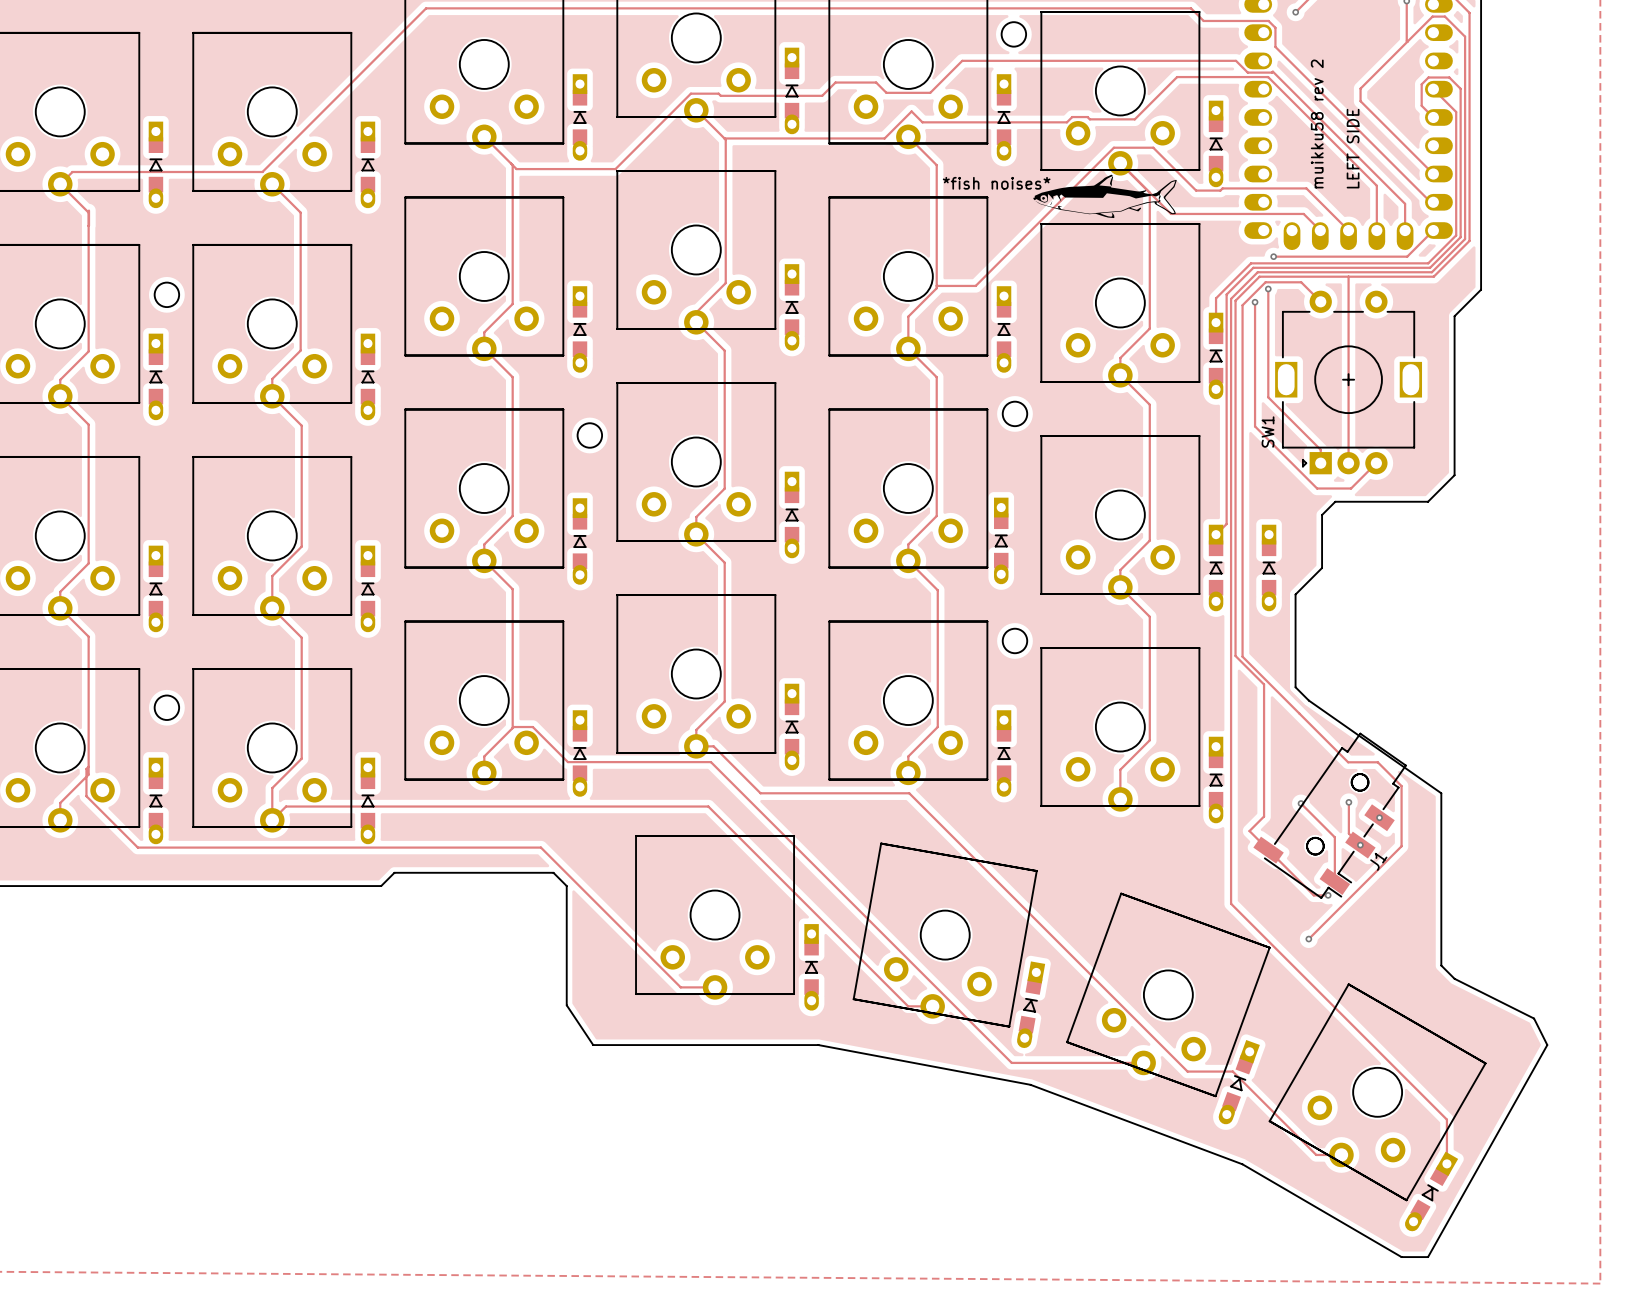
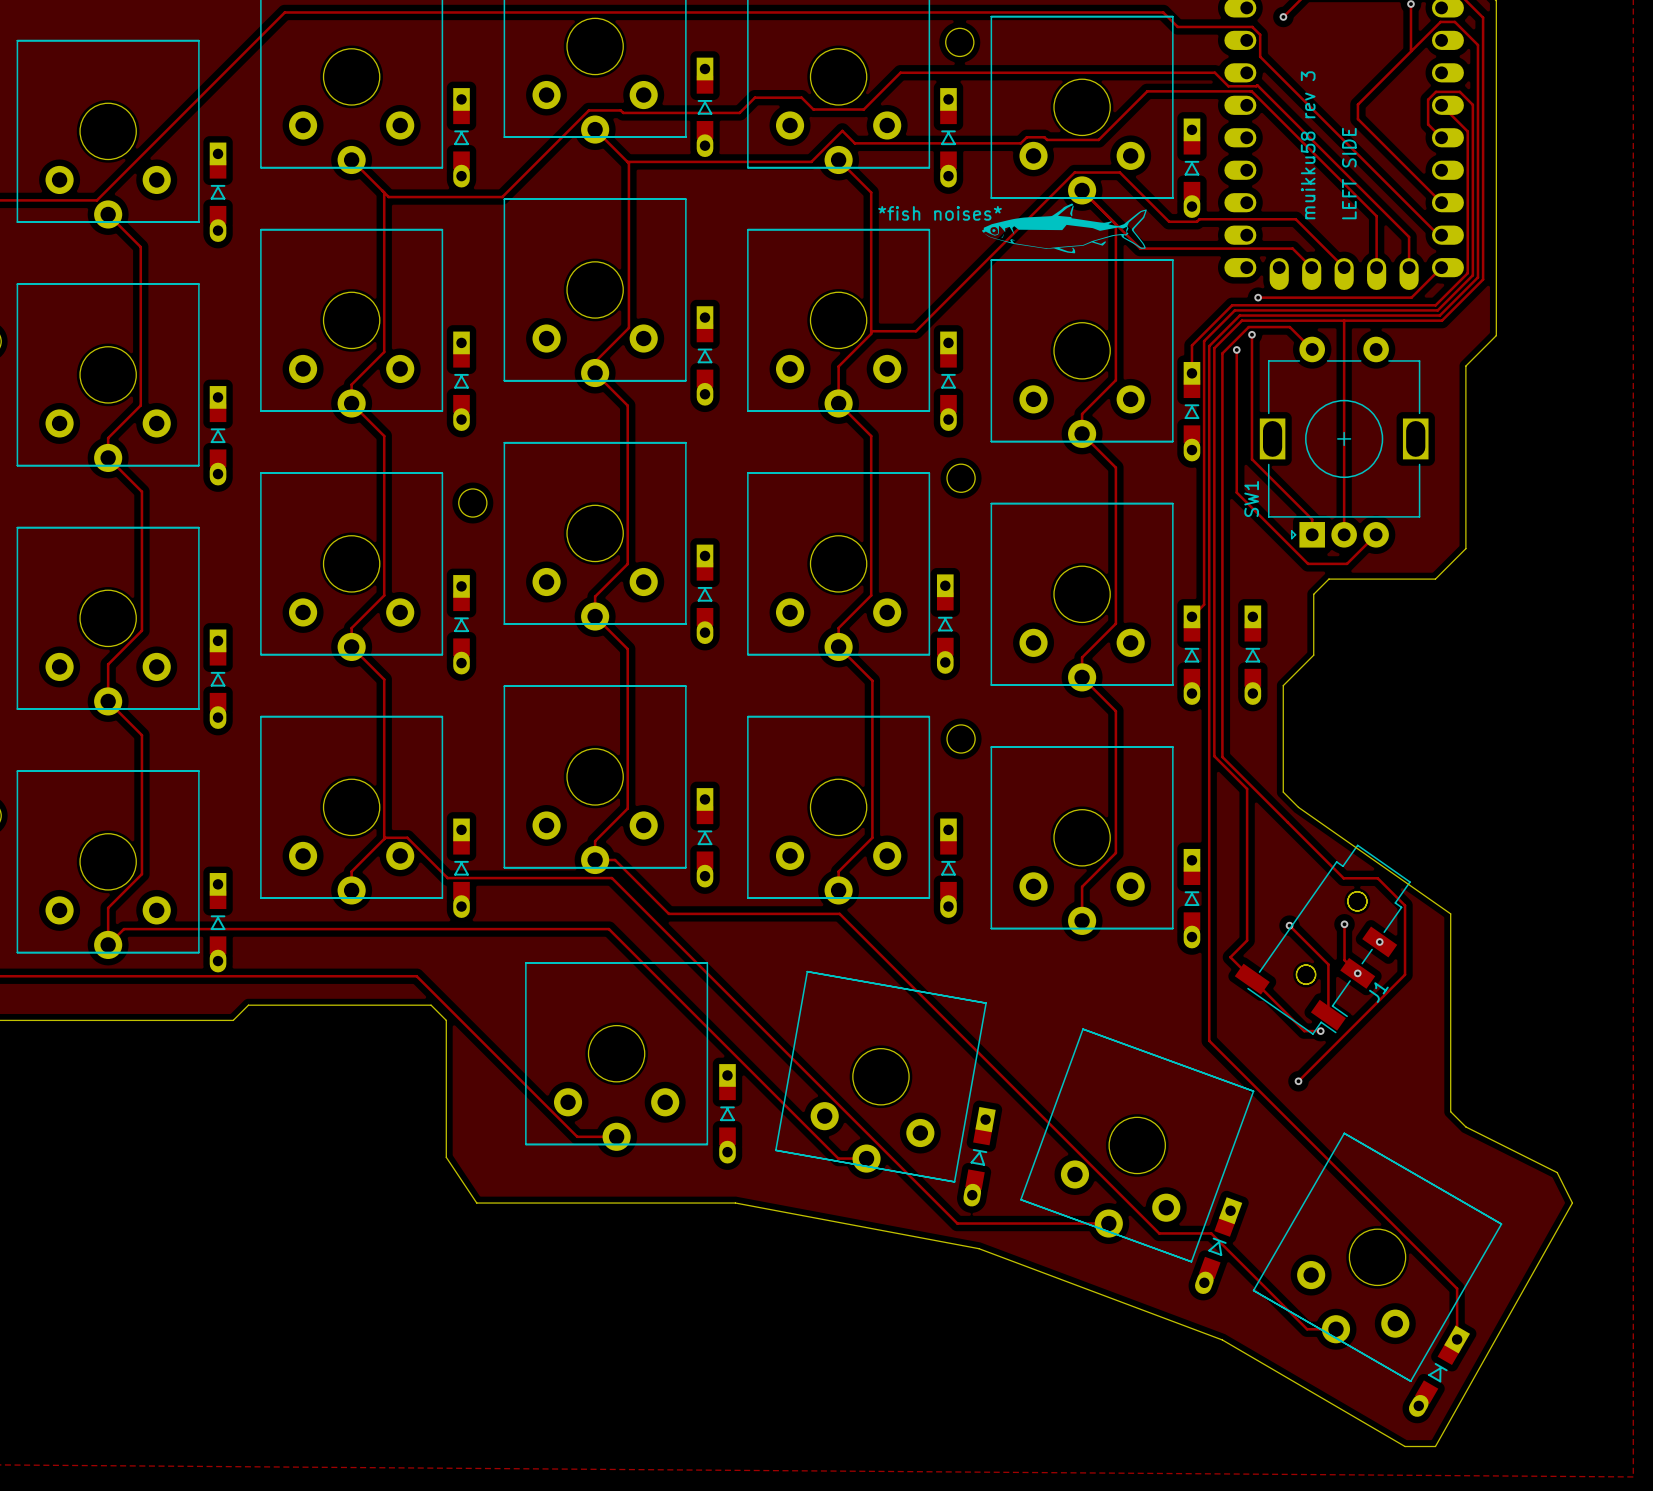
text: muikku58 rev 2 (1317, 123) -> muikku58 rev 3 (1308, 145)

